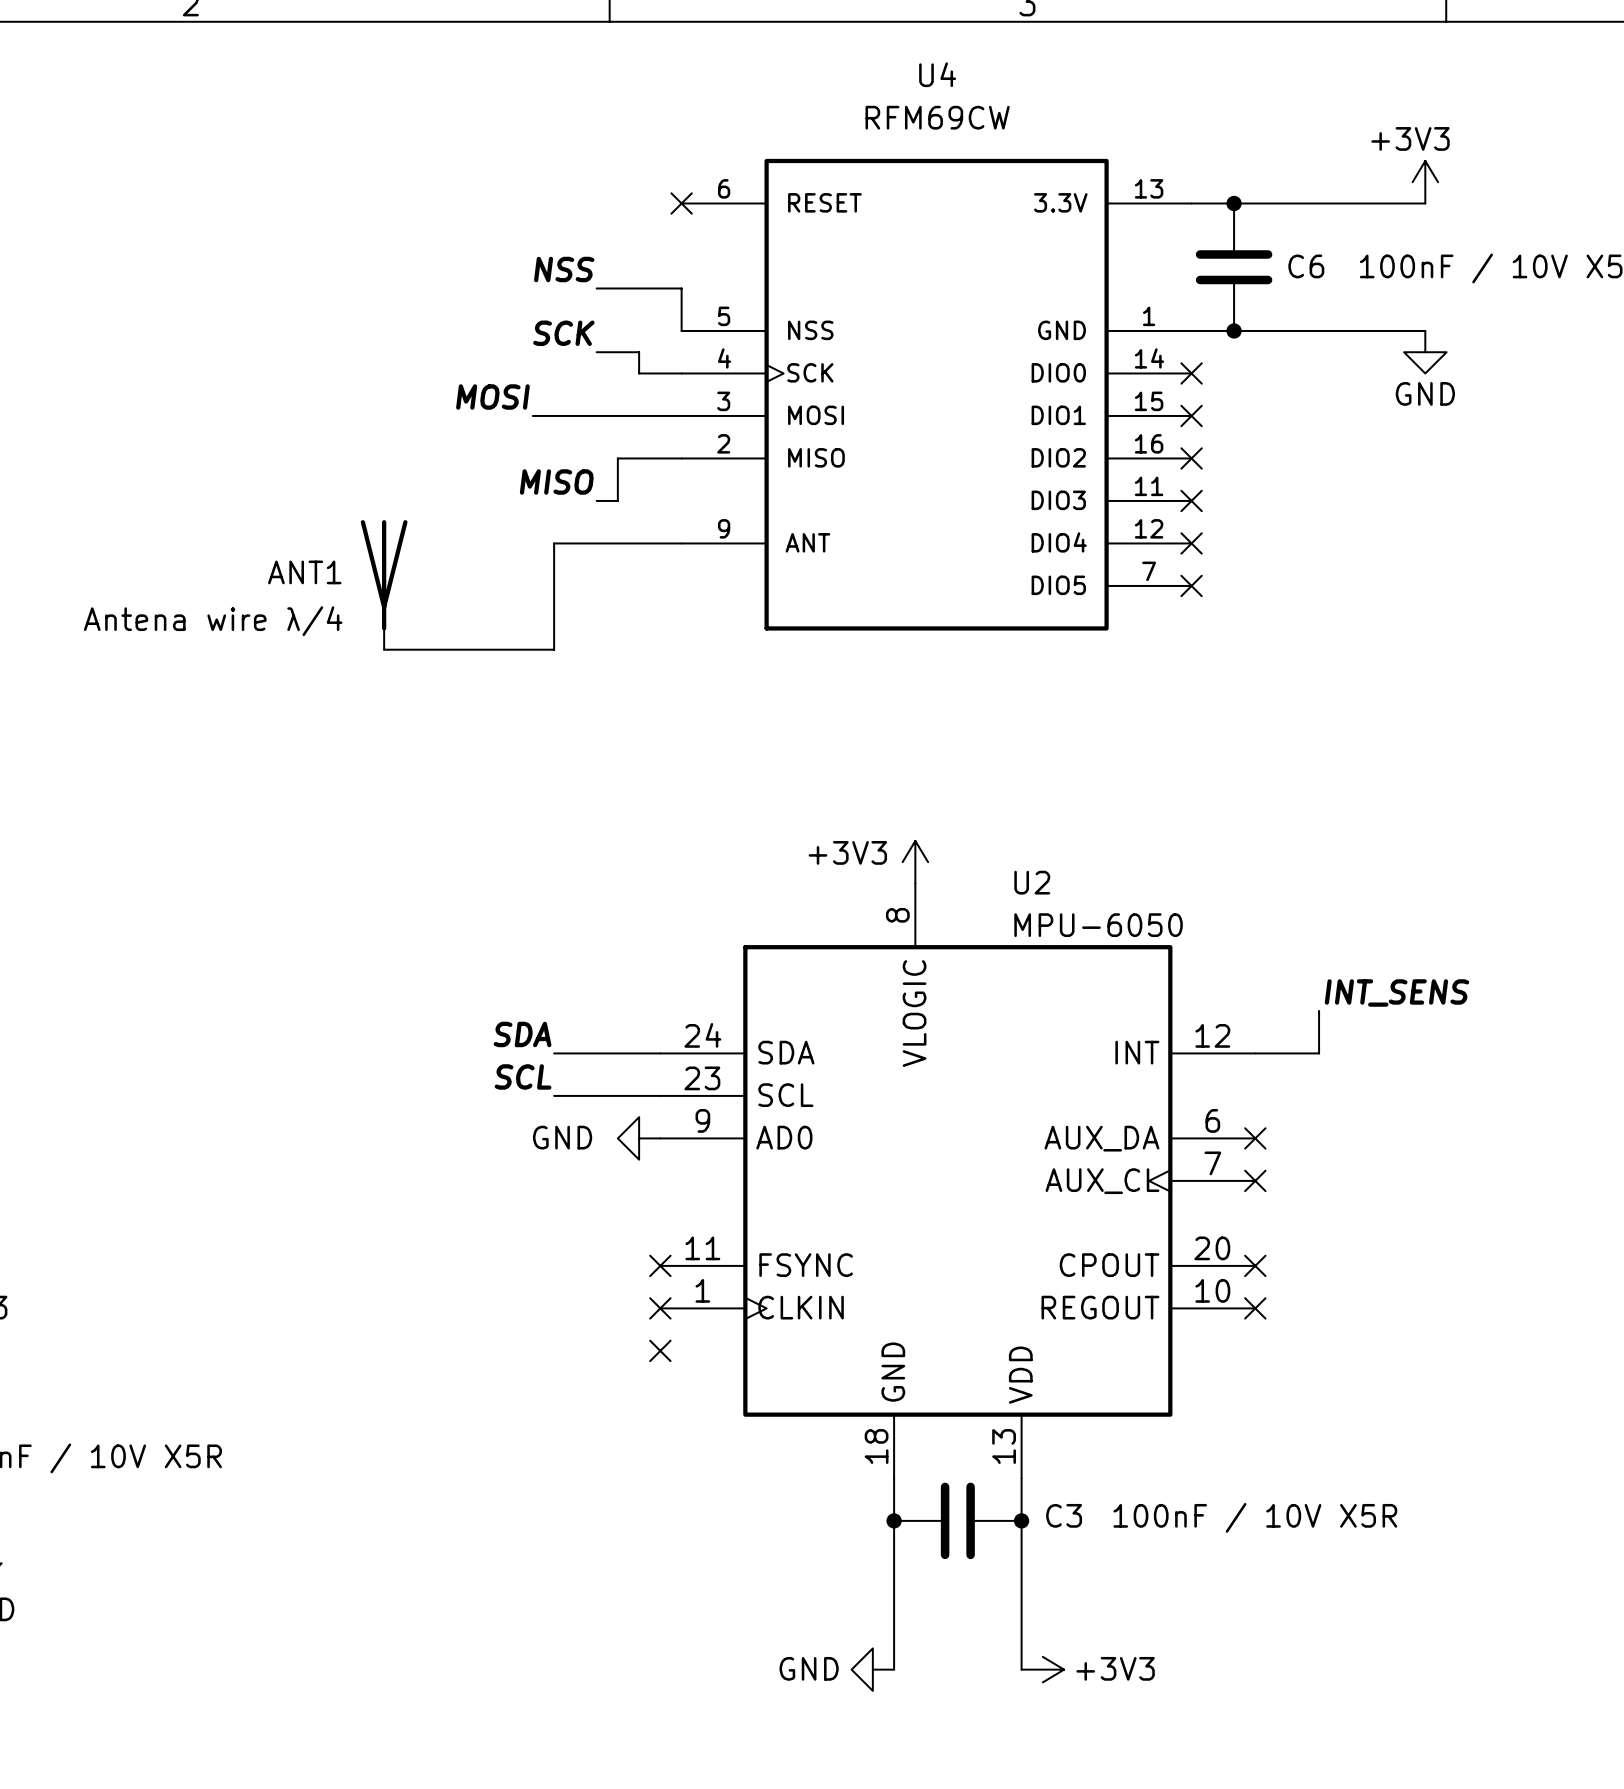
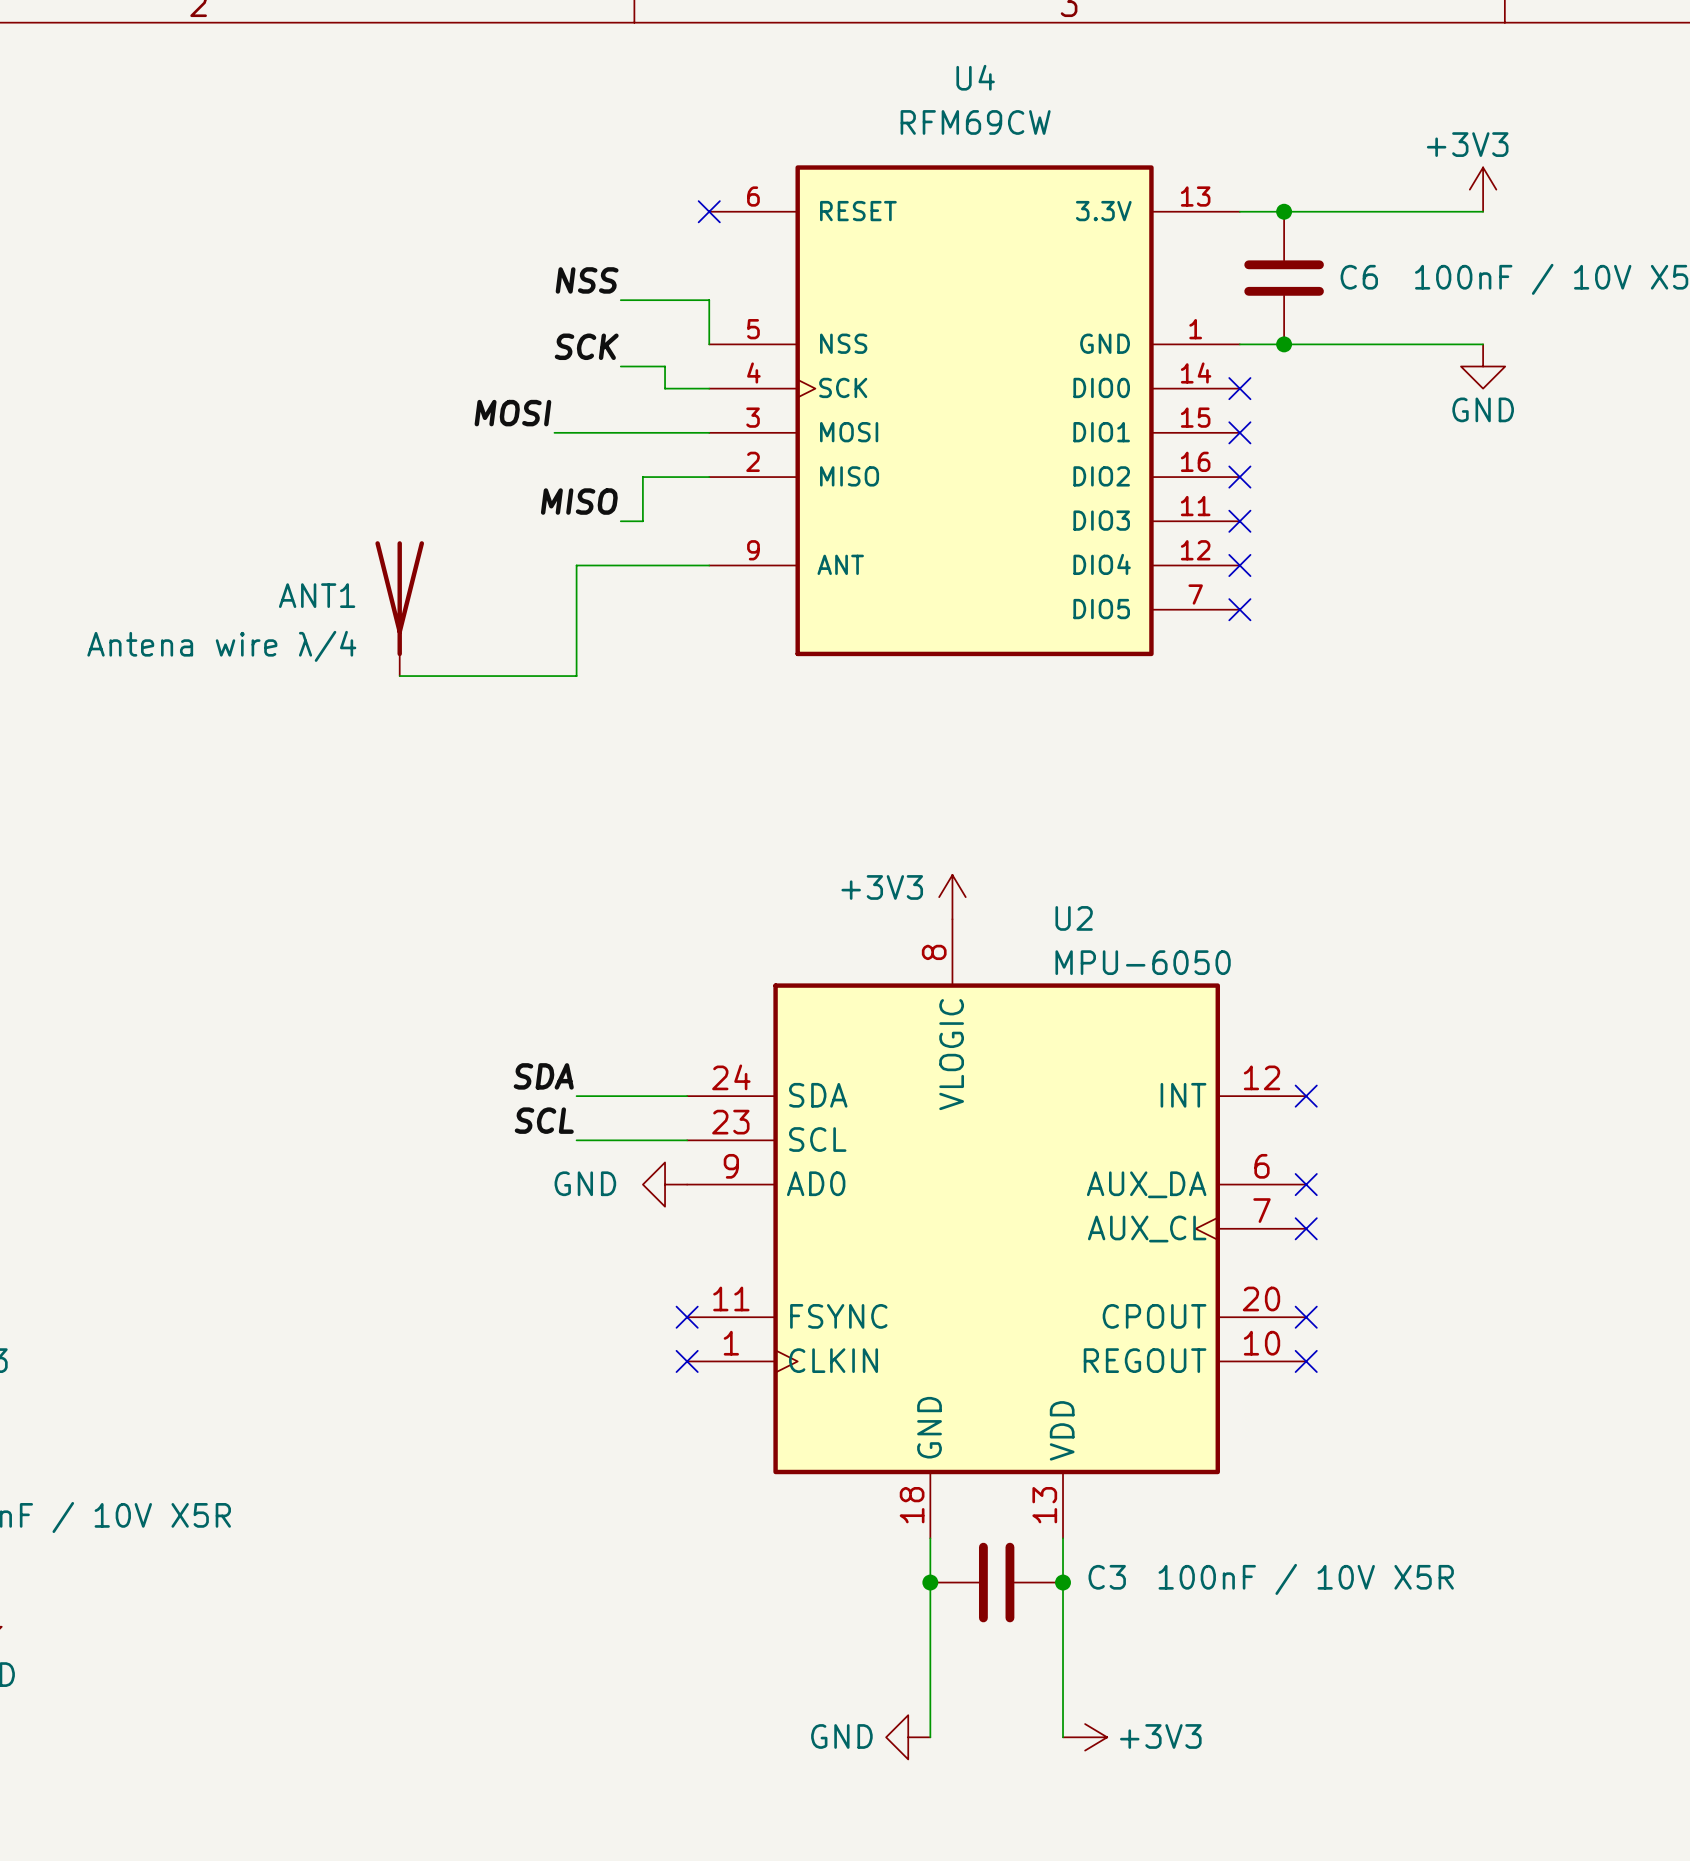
label: INT_SENS (1397, 992) -> none
wire: (1319, 1010) (1319, 1053) (1255, 1053) -> none
no-connect mark: none -> (1306, 1096)
no-connect mark: (660, 1350) -> none

